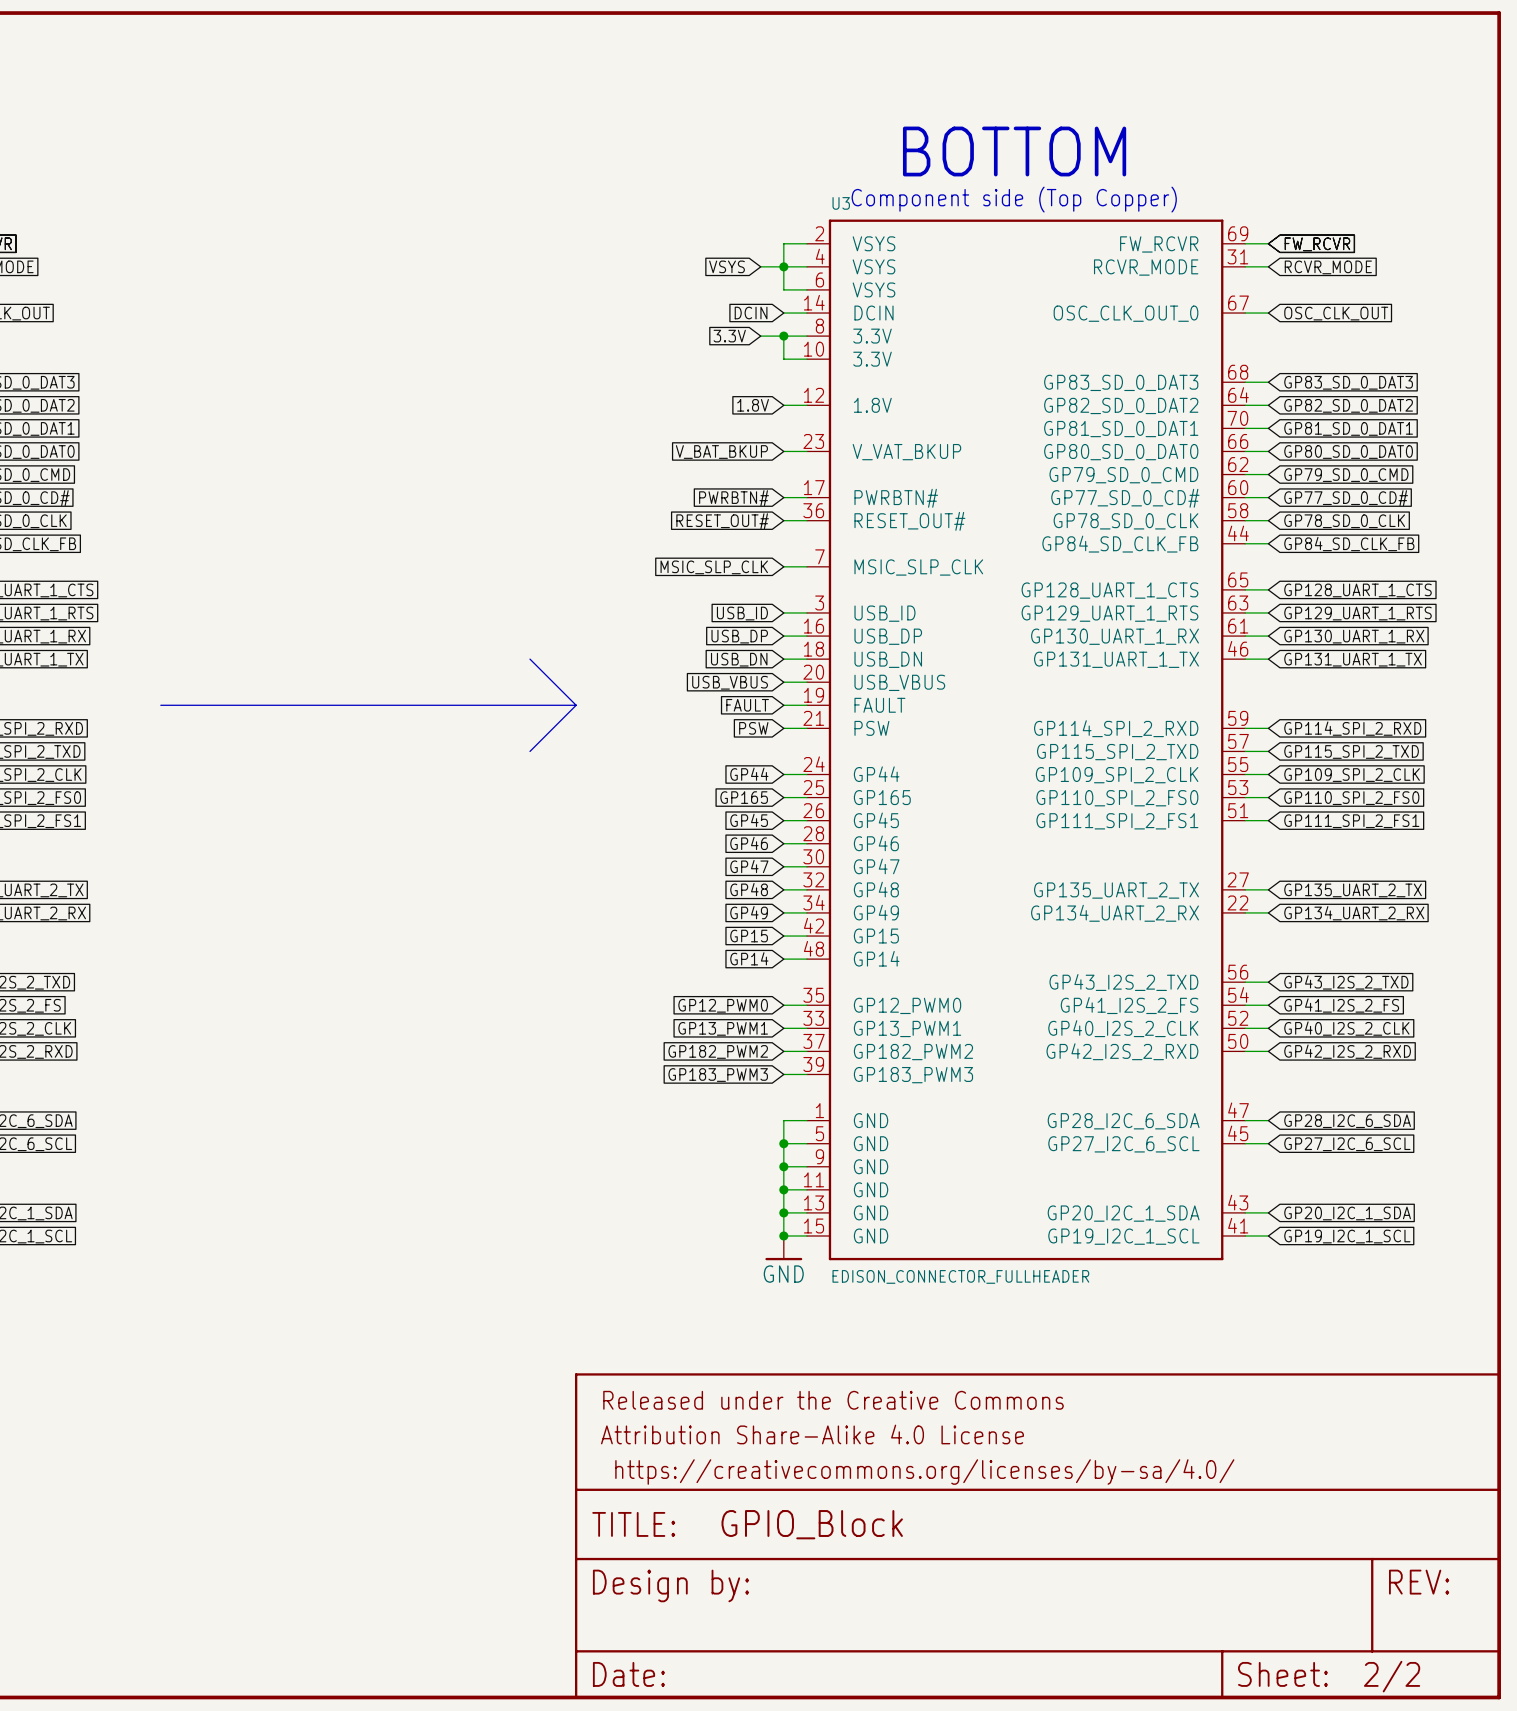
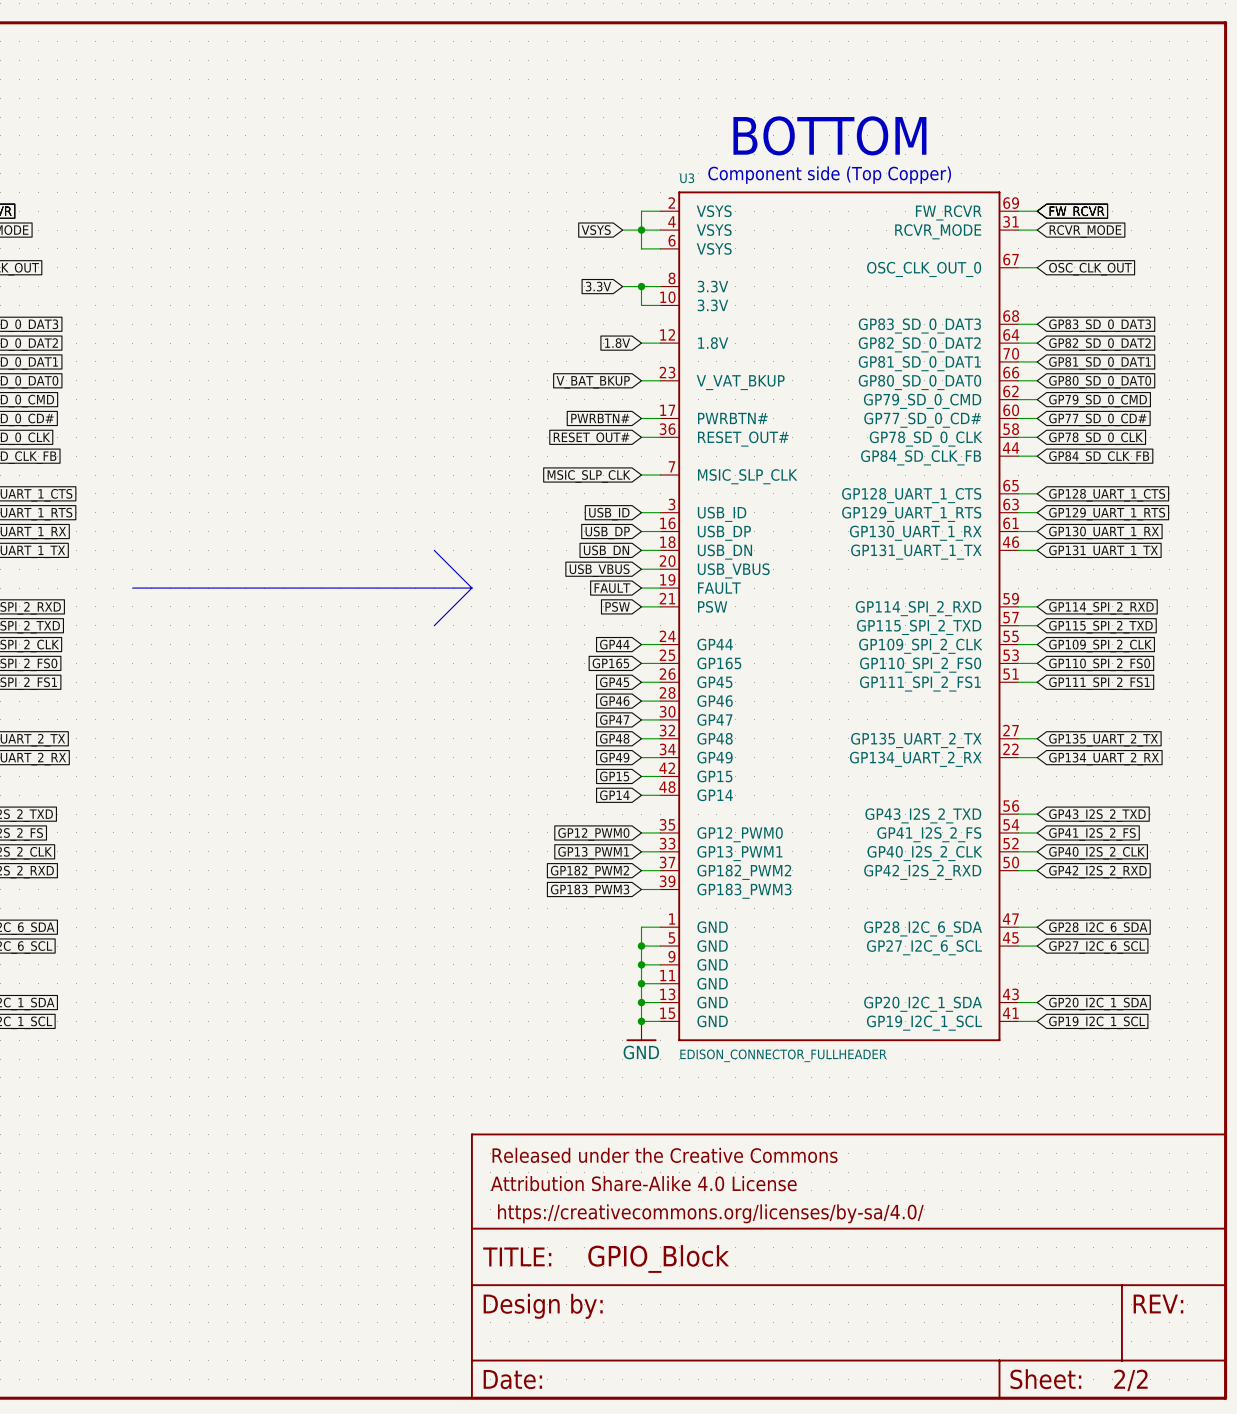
U3 symbol: [806, 219, 1246, 1261] -> [660, 191, 1019, 1042]
global label: DCIN (751, 313) -> none
wire: (783, 313) (806, 313) -> none

